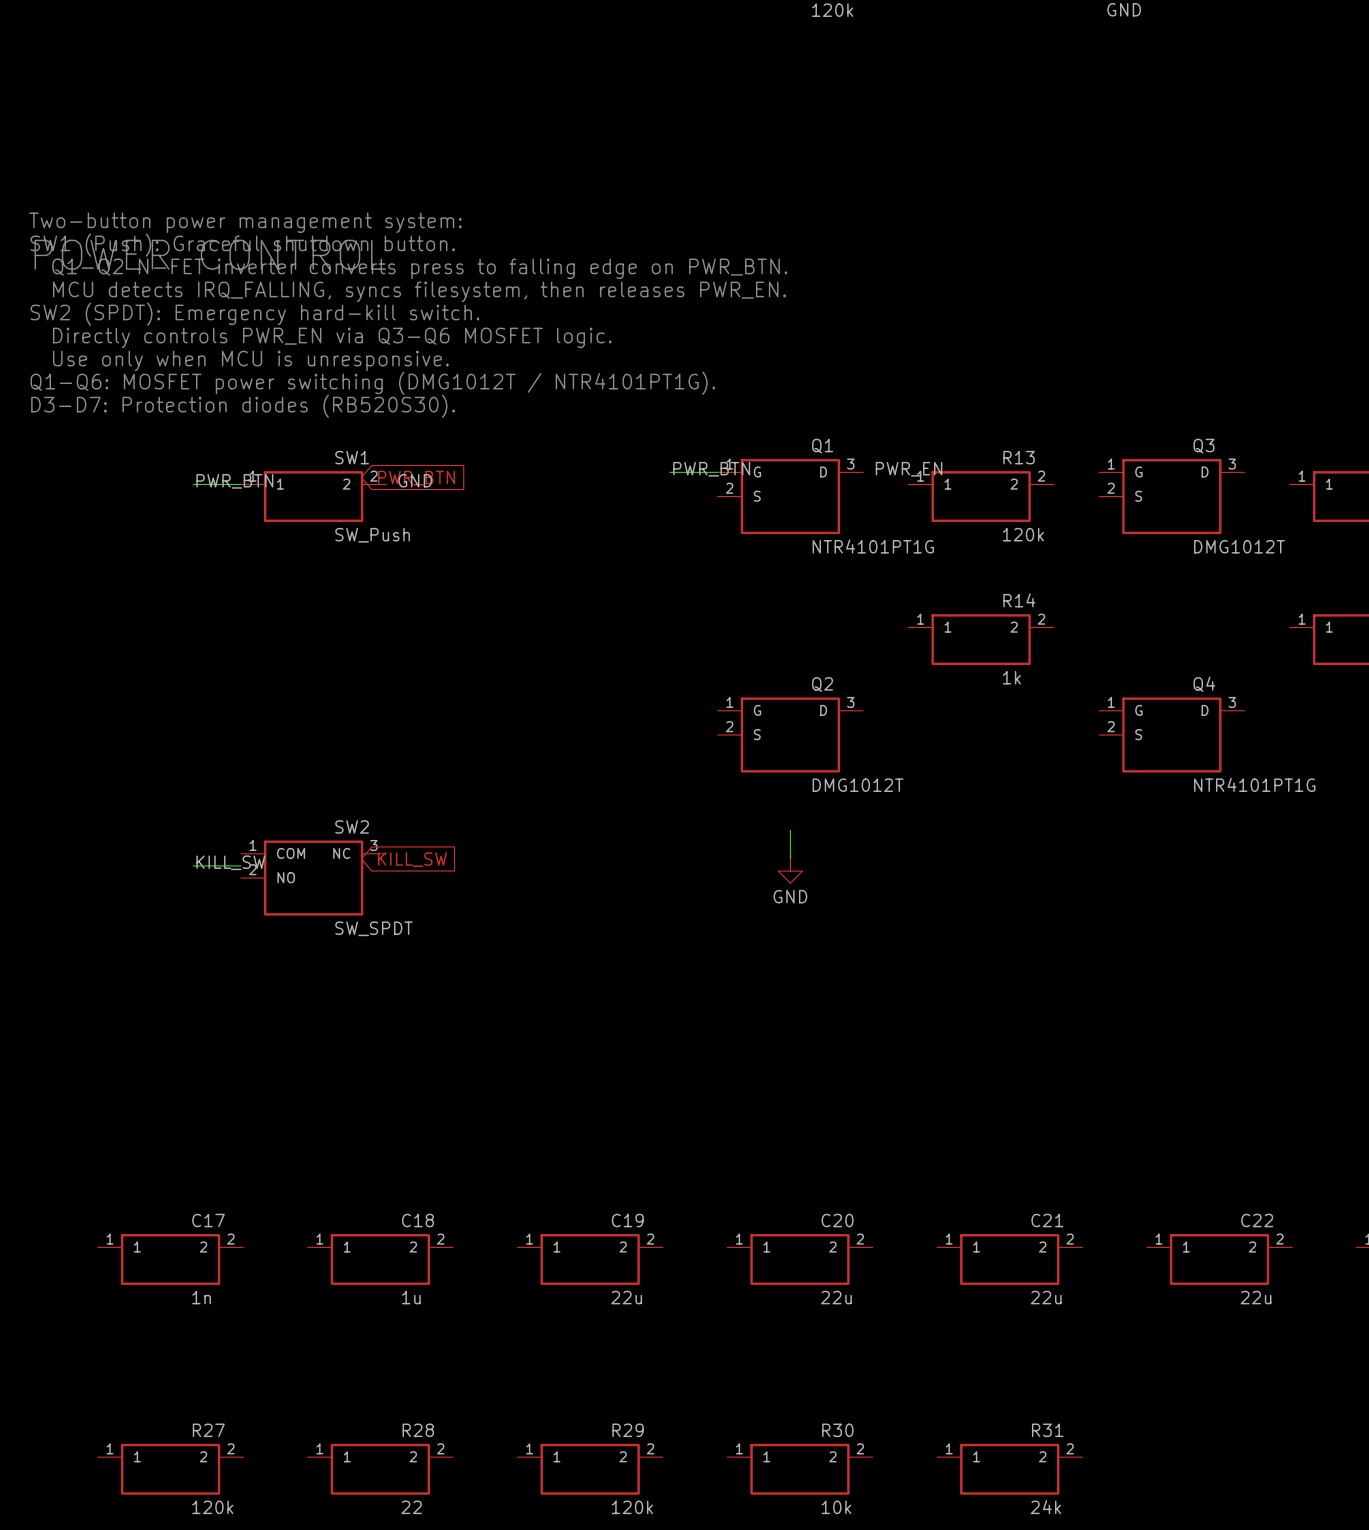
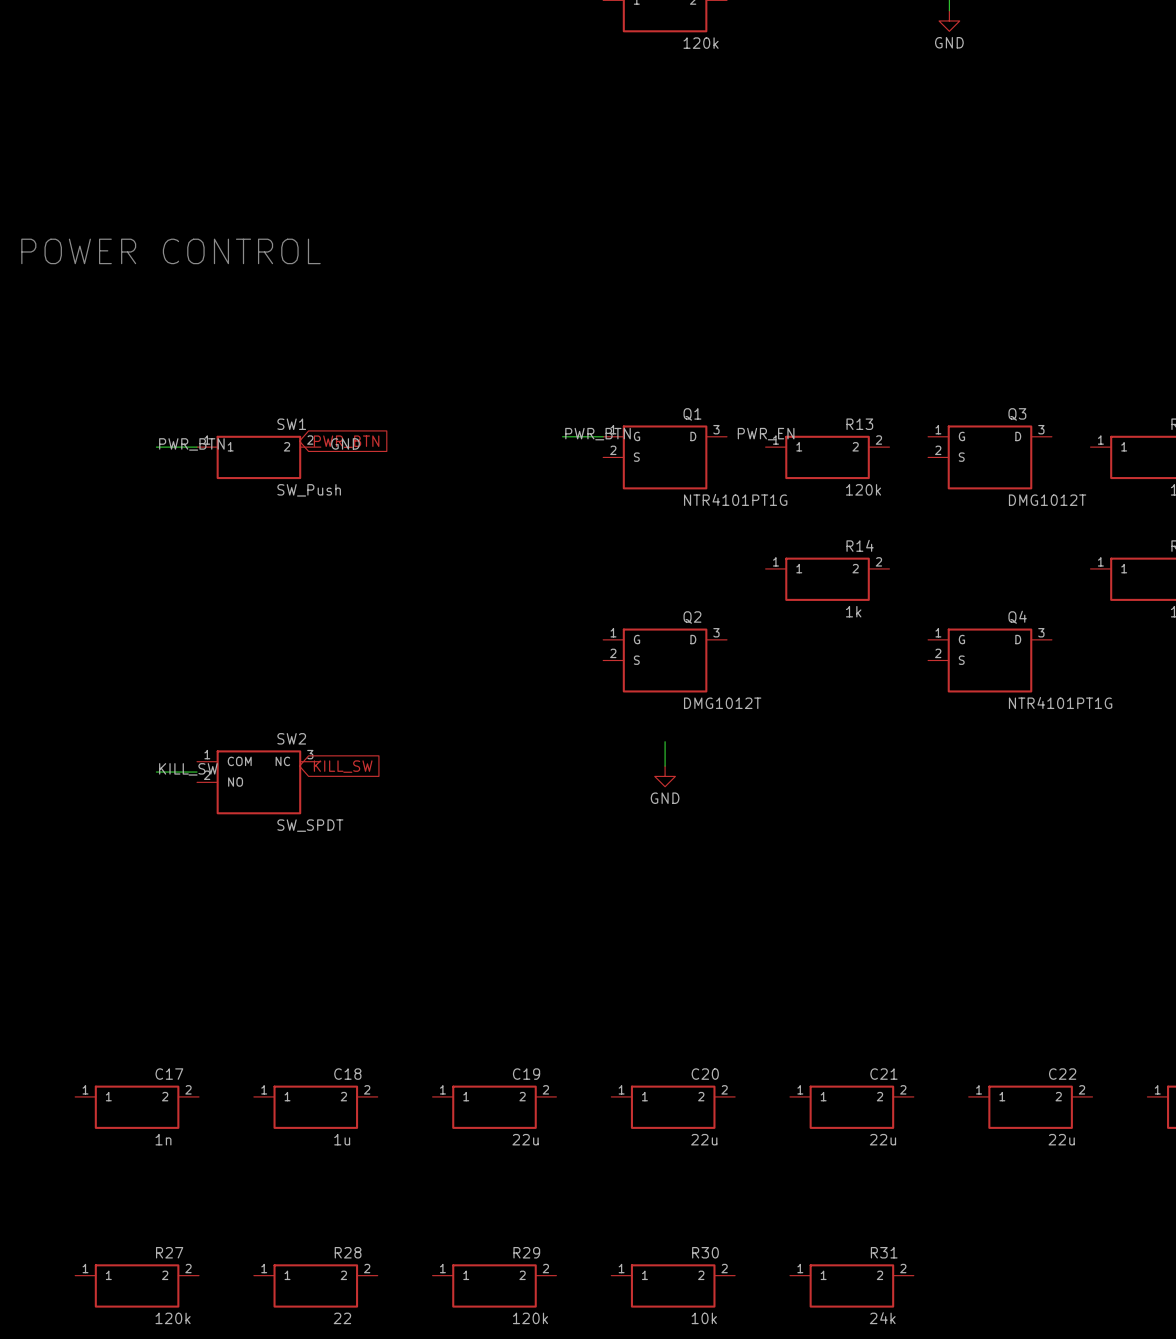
text: Two-button power management system: (245, 222) -> none
text: SW1 (Push): Graceful shutdown button. (242, 245) -> none
text: Q1-Q2 N-FET inverter converts press to falling edge on PWR_BTN. (419, 268) -> none
text: MCU detects IRQ_FALLING, syncs filesystem, then releases PWR_EN. (419, 291) -> none
text: SW2 (SPDT): Emergency hard-kill switch. (254, 314) -> none
text: Directly controls PWR_EN via Q3-Q6 MOSFET logic. (332, 337) -> none
text: Use only when MCU is unresponsive. (250, 360) -> none
text: Q1-Q6: MOSFET power switching (DMG1012T / NTR4101PT1G). (372, 383) -> none
text: D3-D7: Protection diodes (RB520S30). (243, 406) -> none

